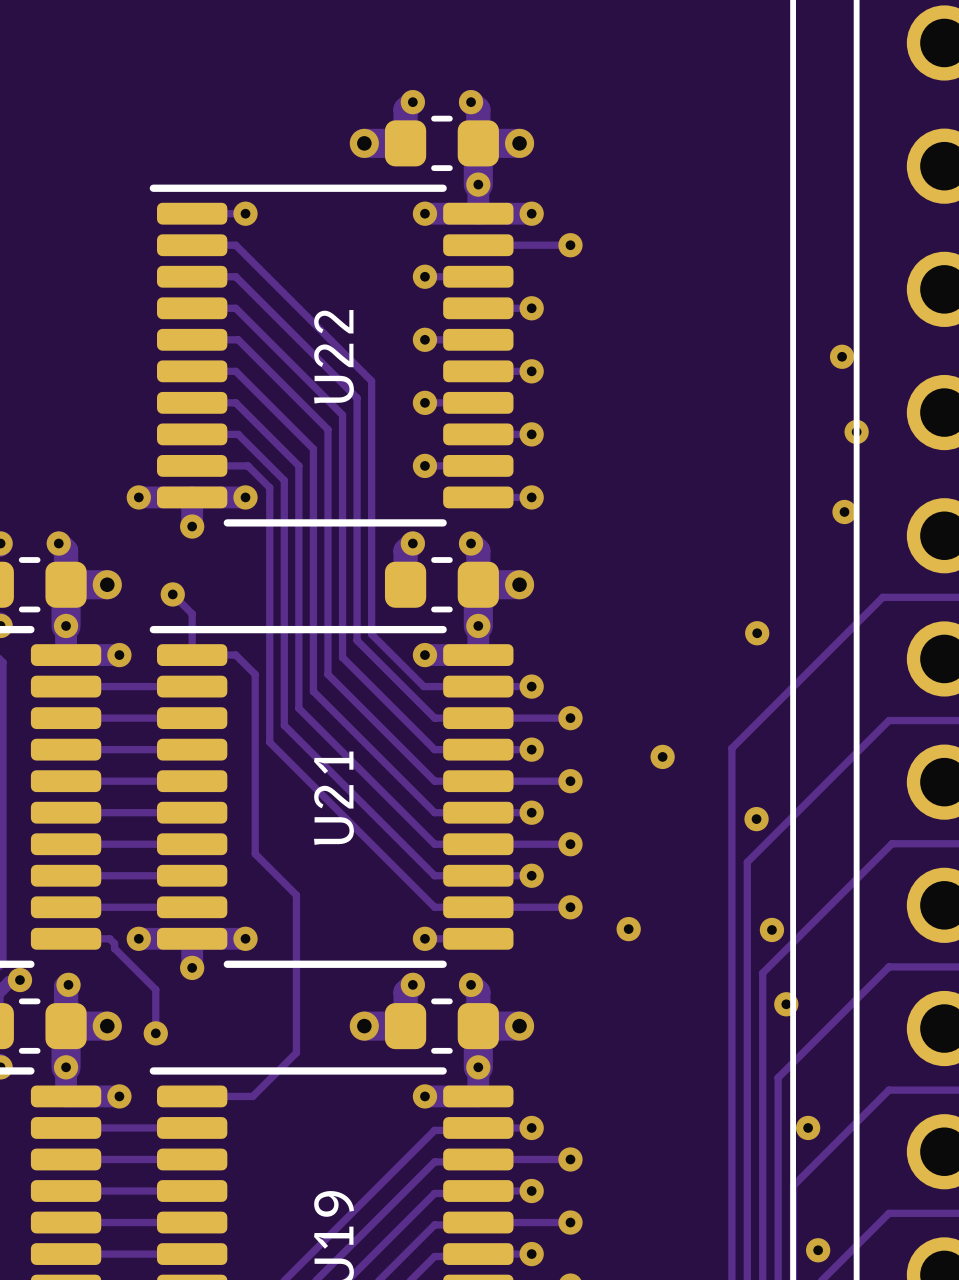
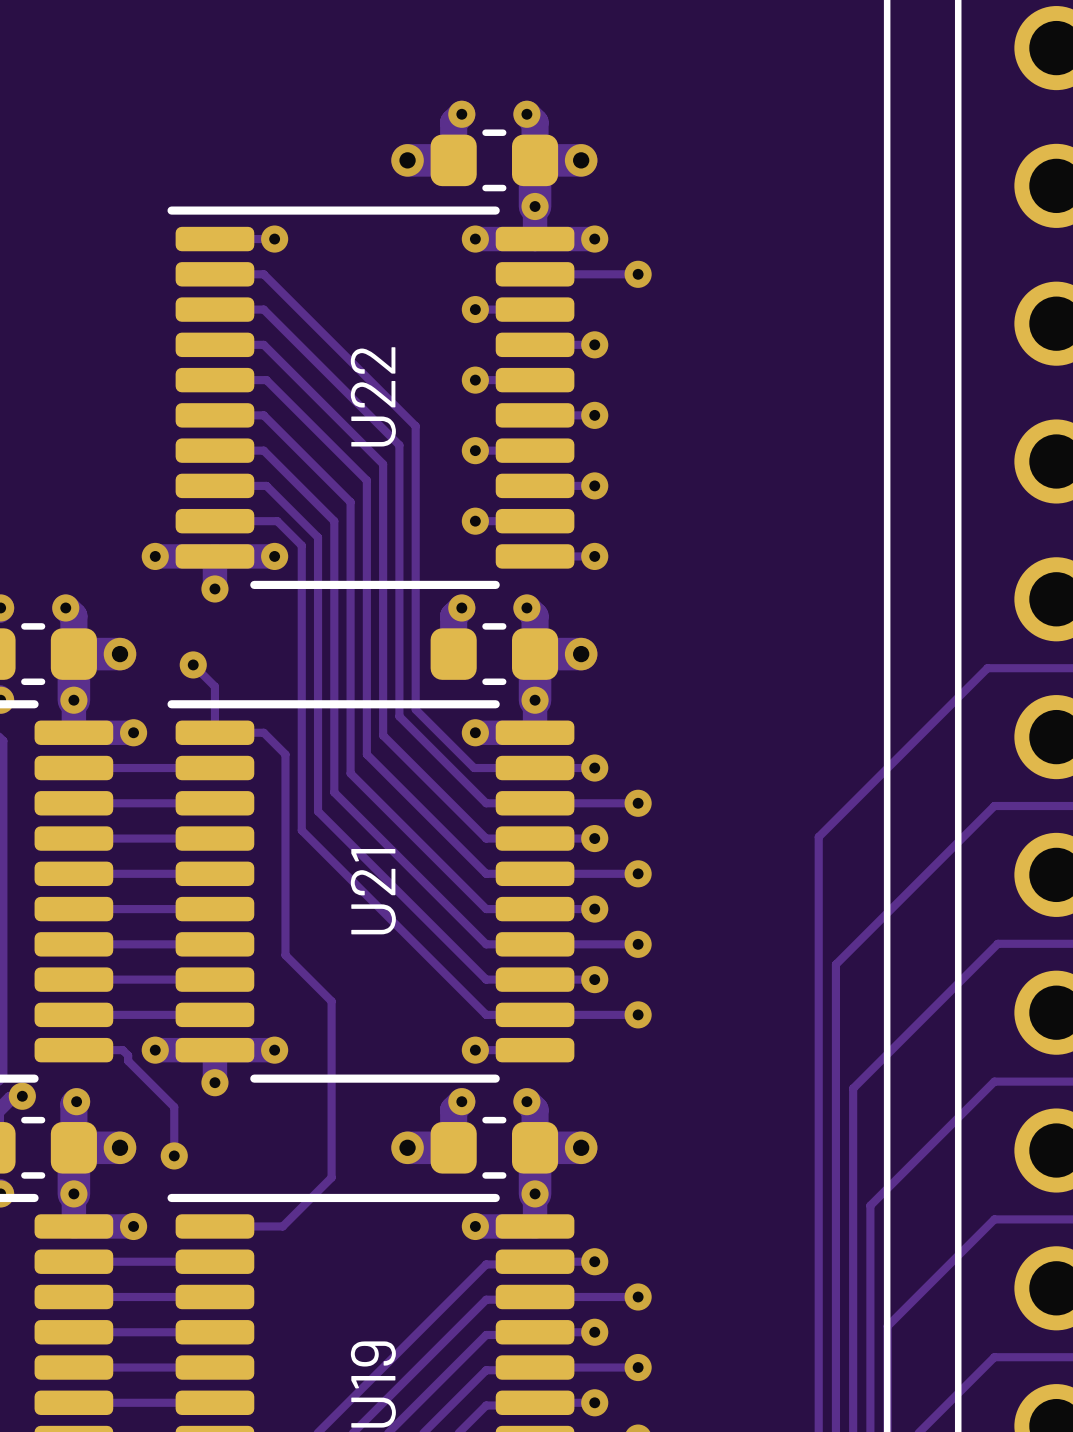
via: (842, 356) -> none
via: (856, 431) -> none
via: (844, 511) -> none
via: (757, 633) -> none
via: (662, 756) -> none
via: (756, 819) -> none
via: (628, 929) -> none
via: (771, 929) -> none
via: (786, 1004) -> none
via: (808, 1127) -> none
via: (818, 1250) -> none

